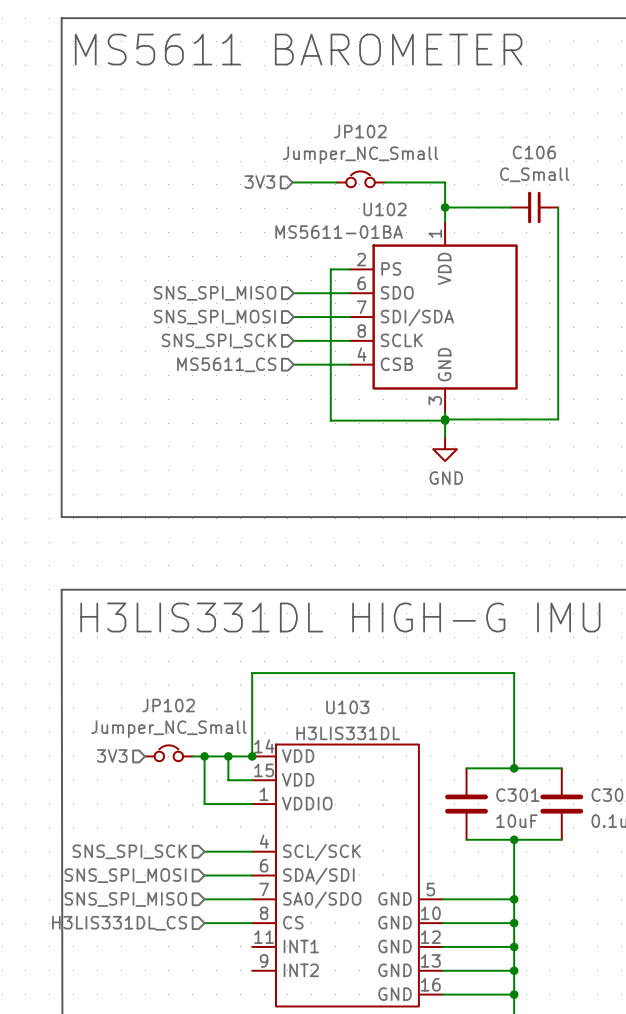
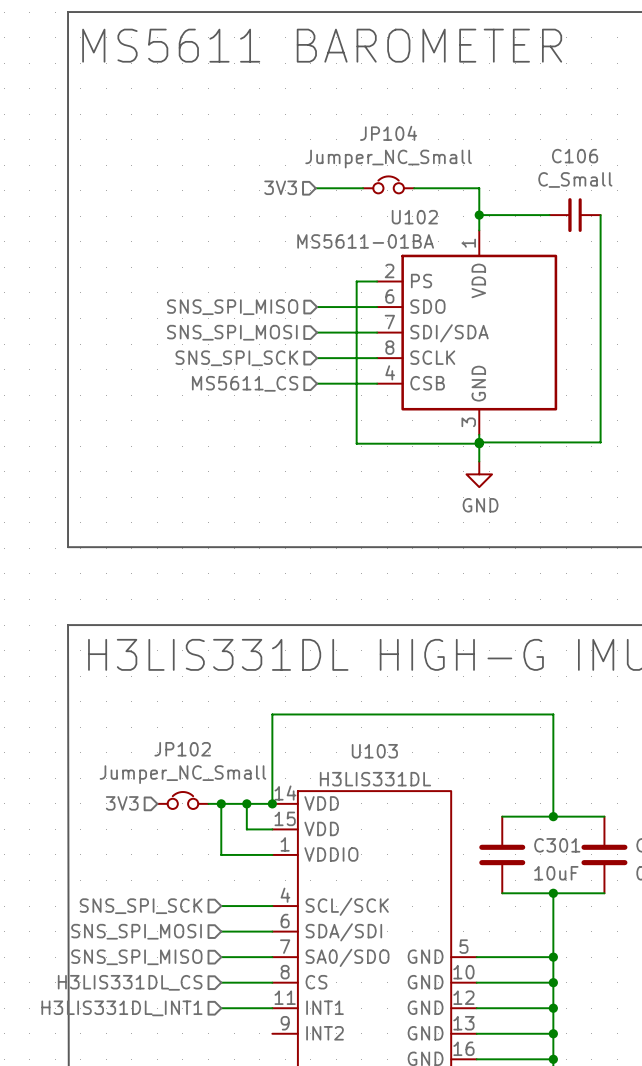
JP102 name: JP102 (360, 131) -> JP104 (388, 133)
wire: none -> (221, 1008) (272, 1008)
hierarchical label: none -> H3LIS331DL_INT1 (121, 1008)

